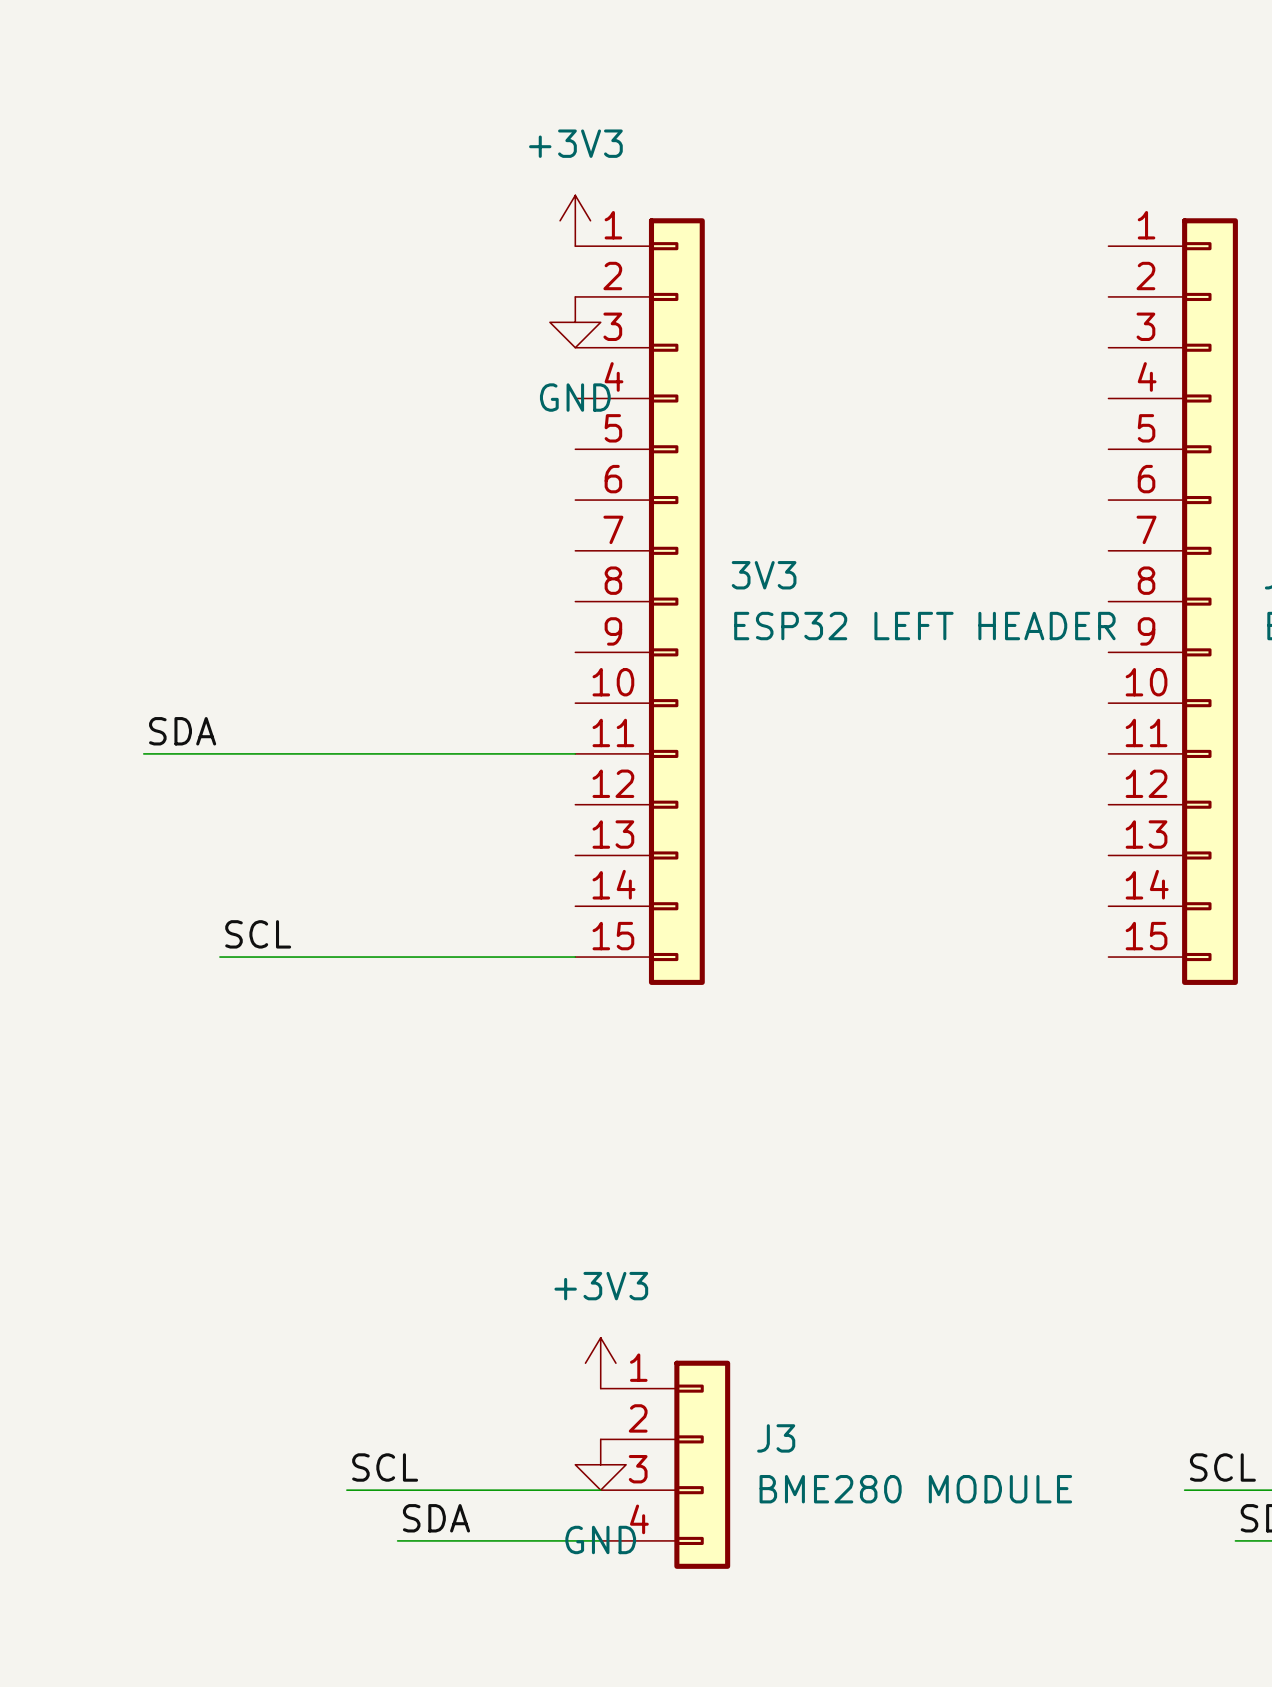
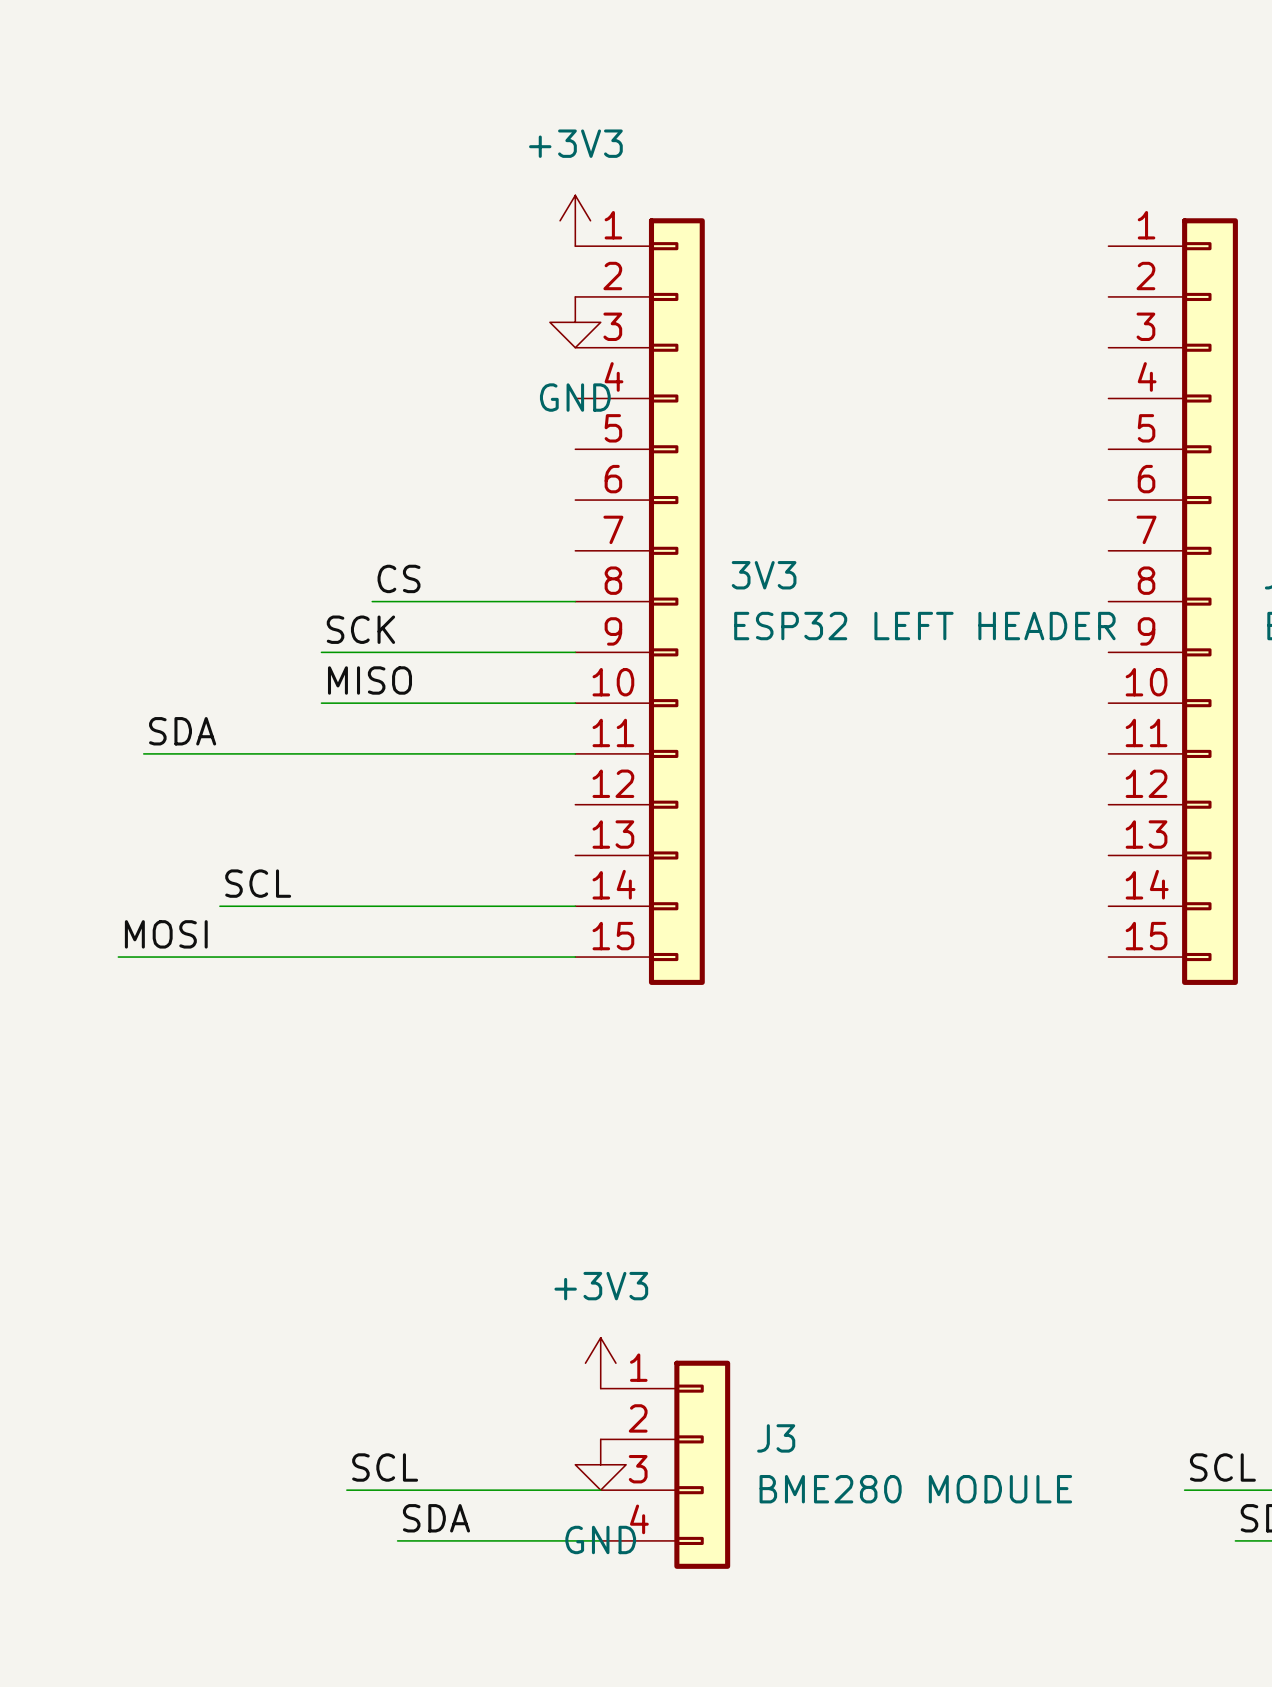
label: none -> CS (399, 578)
wire: none -> (372, 601) (575, 601)
label: none -> SCK (360, 629)
wire: none -> (321, 652) (575, 652)
label: none -> MISO (369, 680)
wire: none -> (321, 703) (575, 703)
wire: none -> (219, 906) (575, 906)
label: none -> MOSI (166, 934)
label position: SCL (258, 934) -> SCL (258, 883)
wire: none -> (118, 957) (219, 957)

